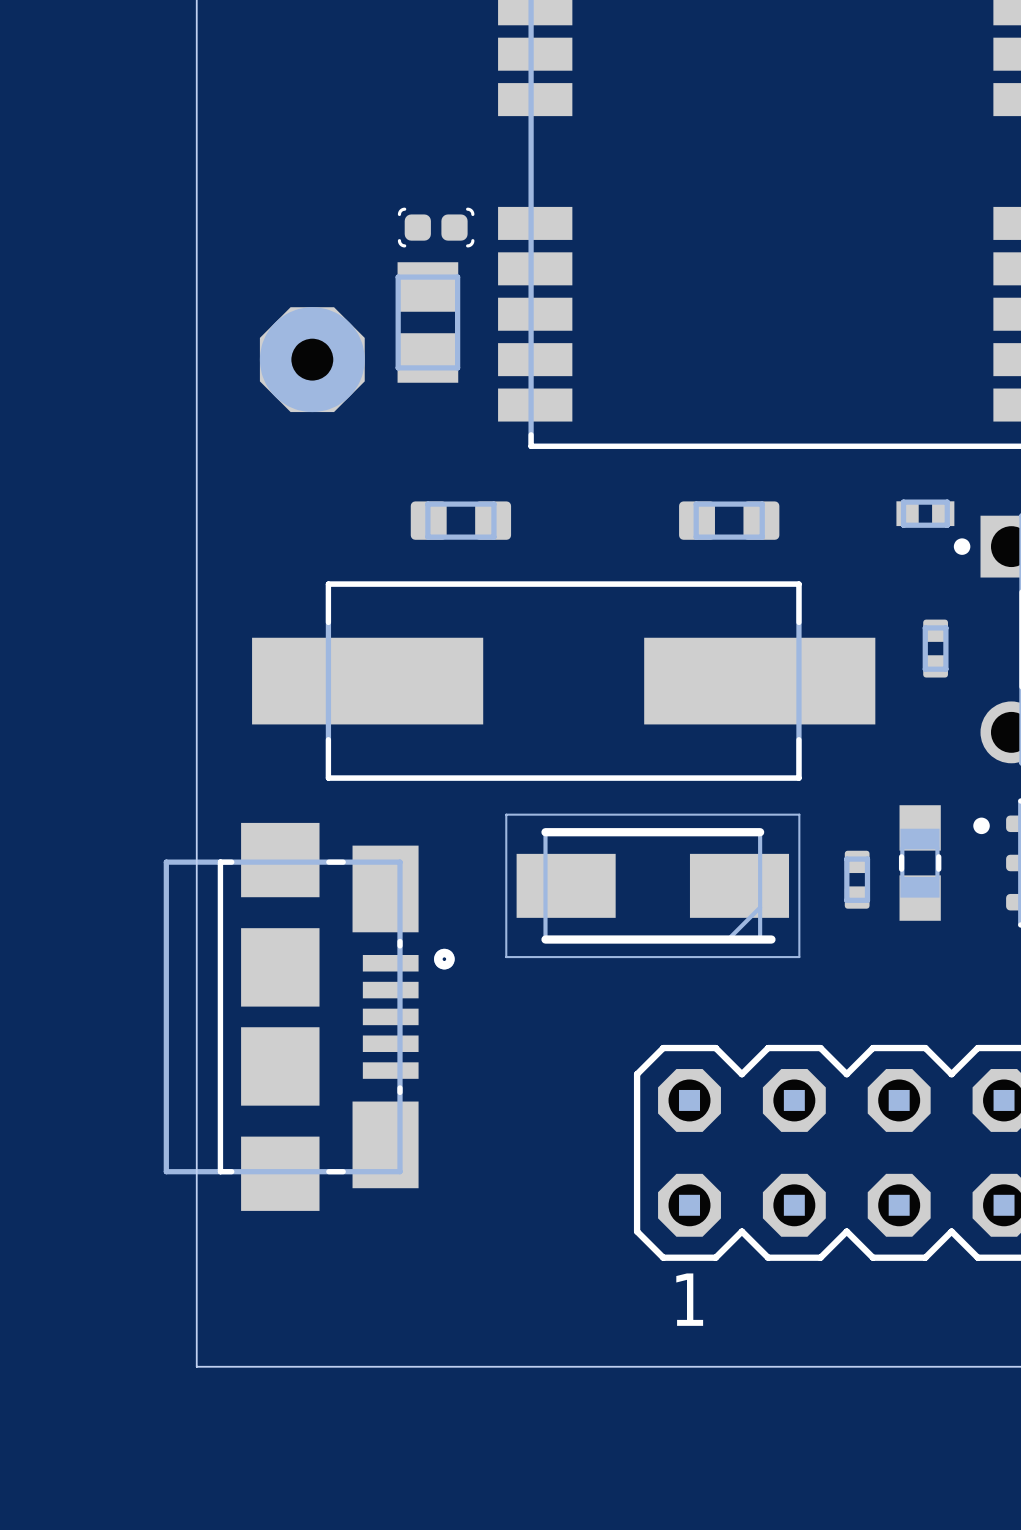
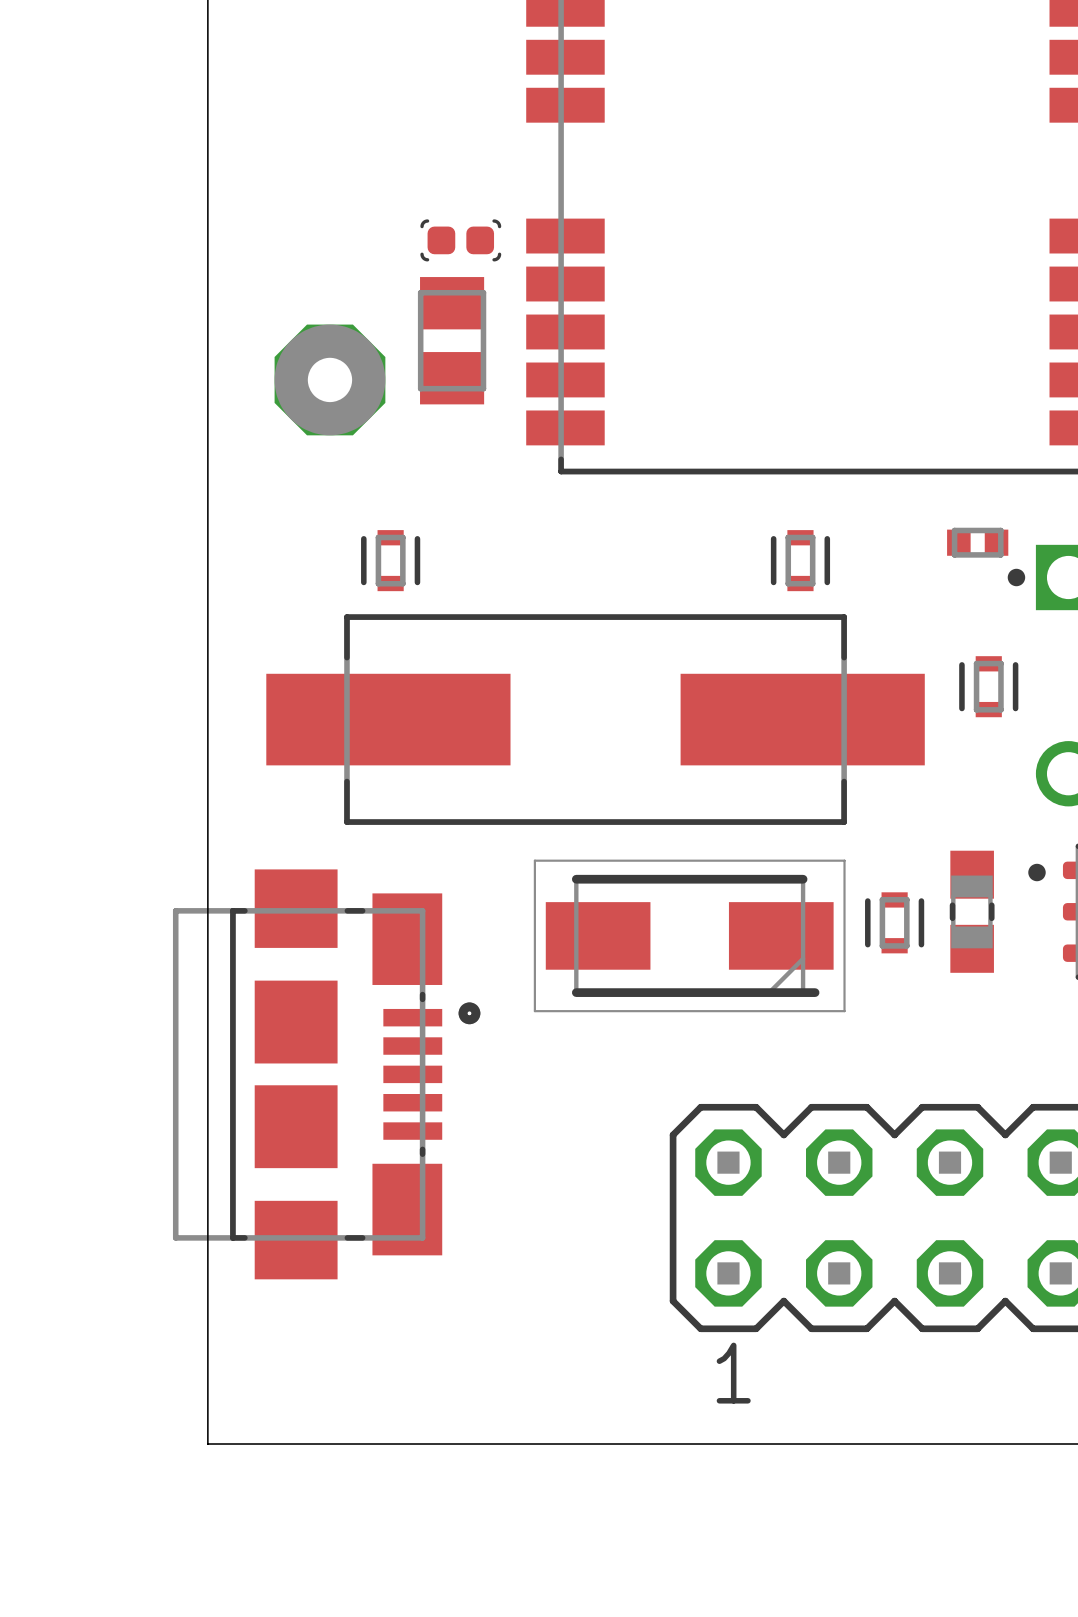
part footprint: [679, 501, 780, 540] -> [770, 530, 831, 592]
part: (460, 520) -> none
part: none -> (390, 560)
part footprint: [922, 619, 949, 678] -> [959, 656, 1019, 718]
part footprint: [844, 850, 871, 909] -> [865, 892, 925, 954]

